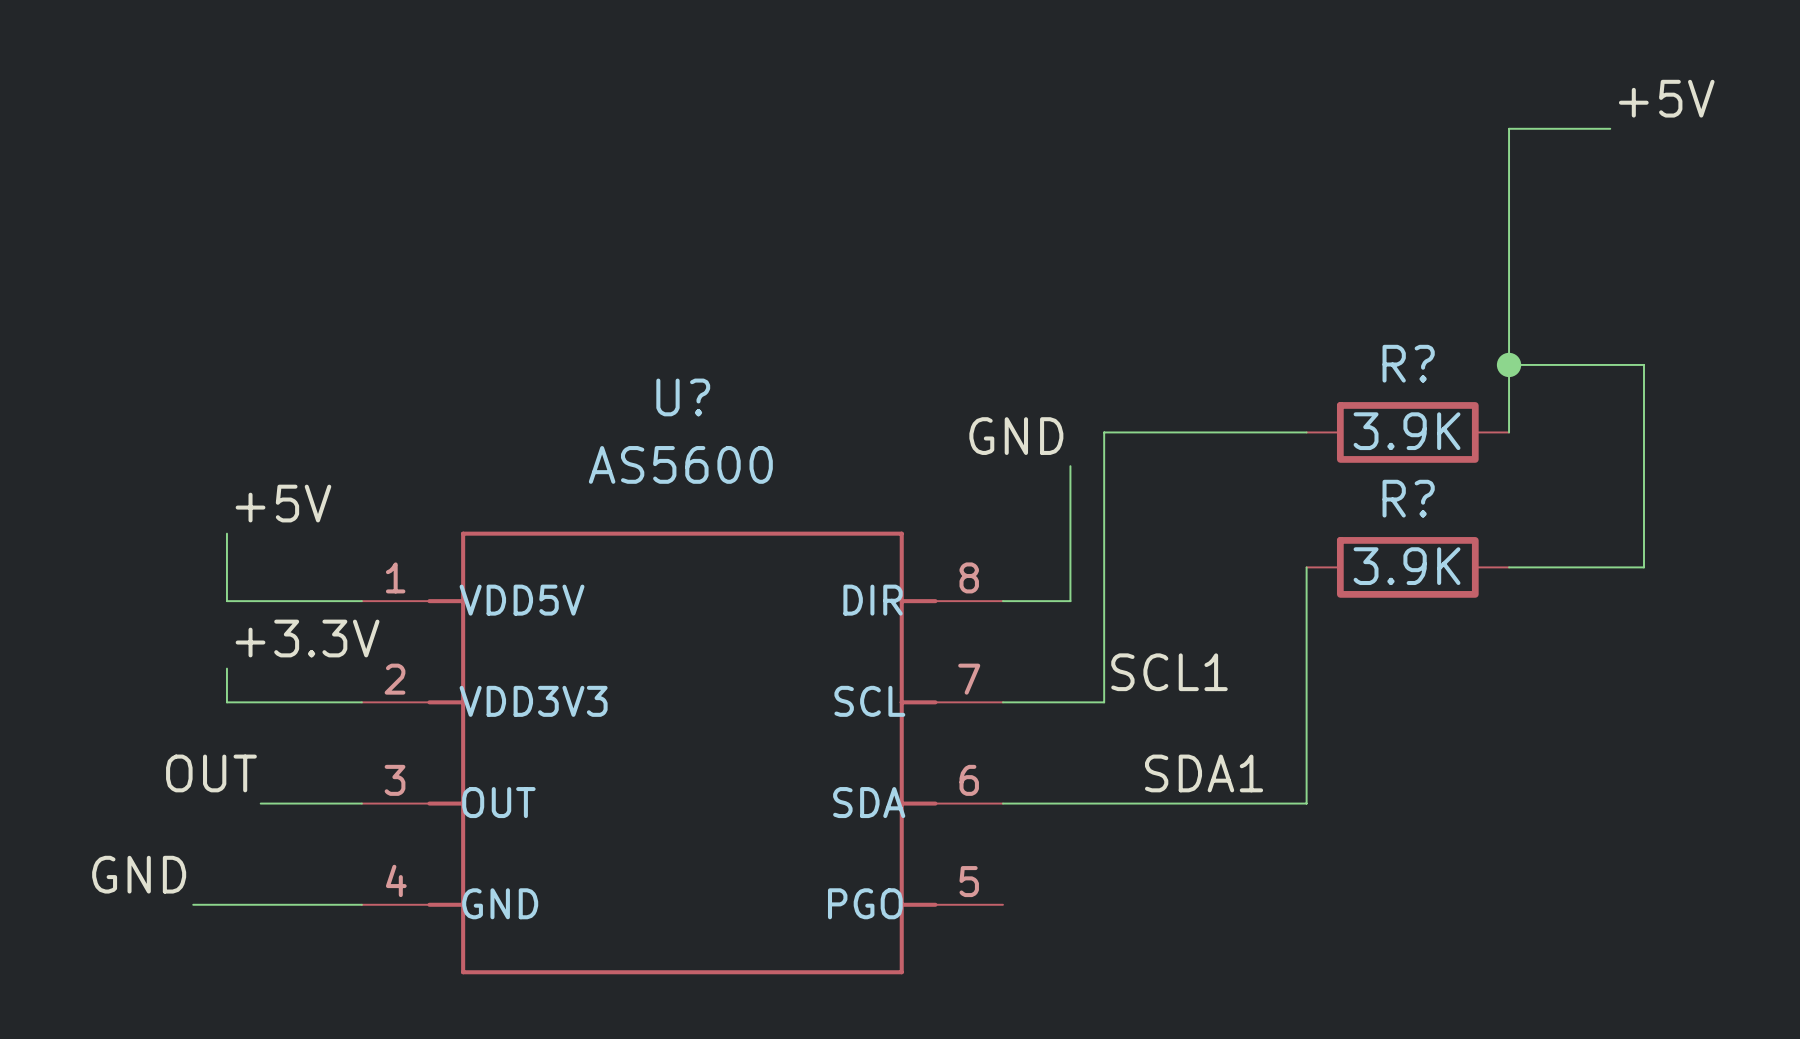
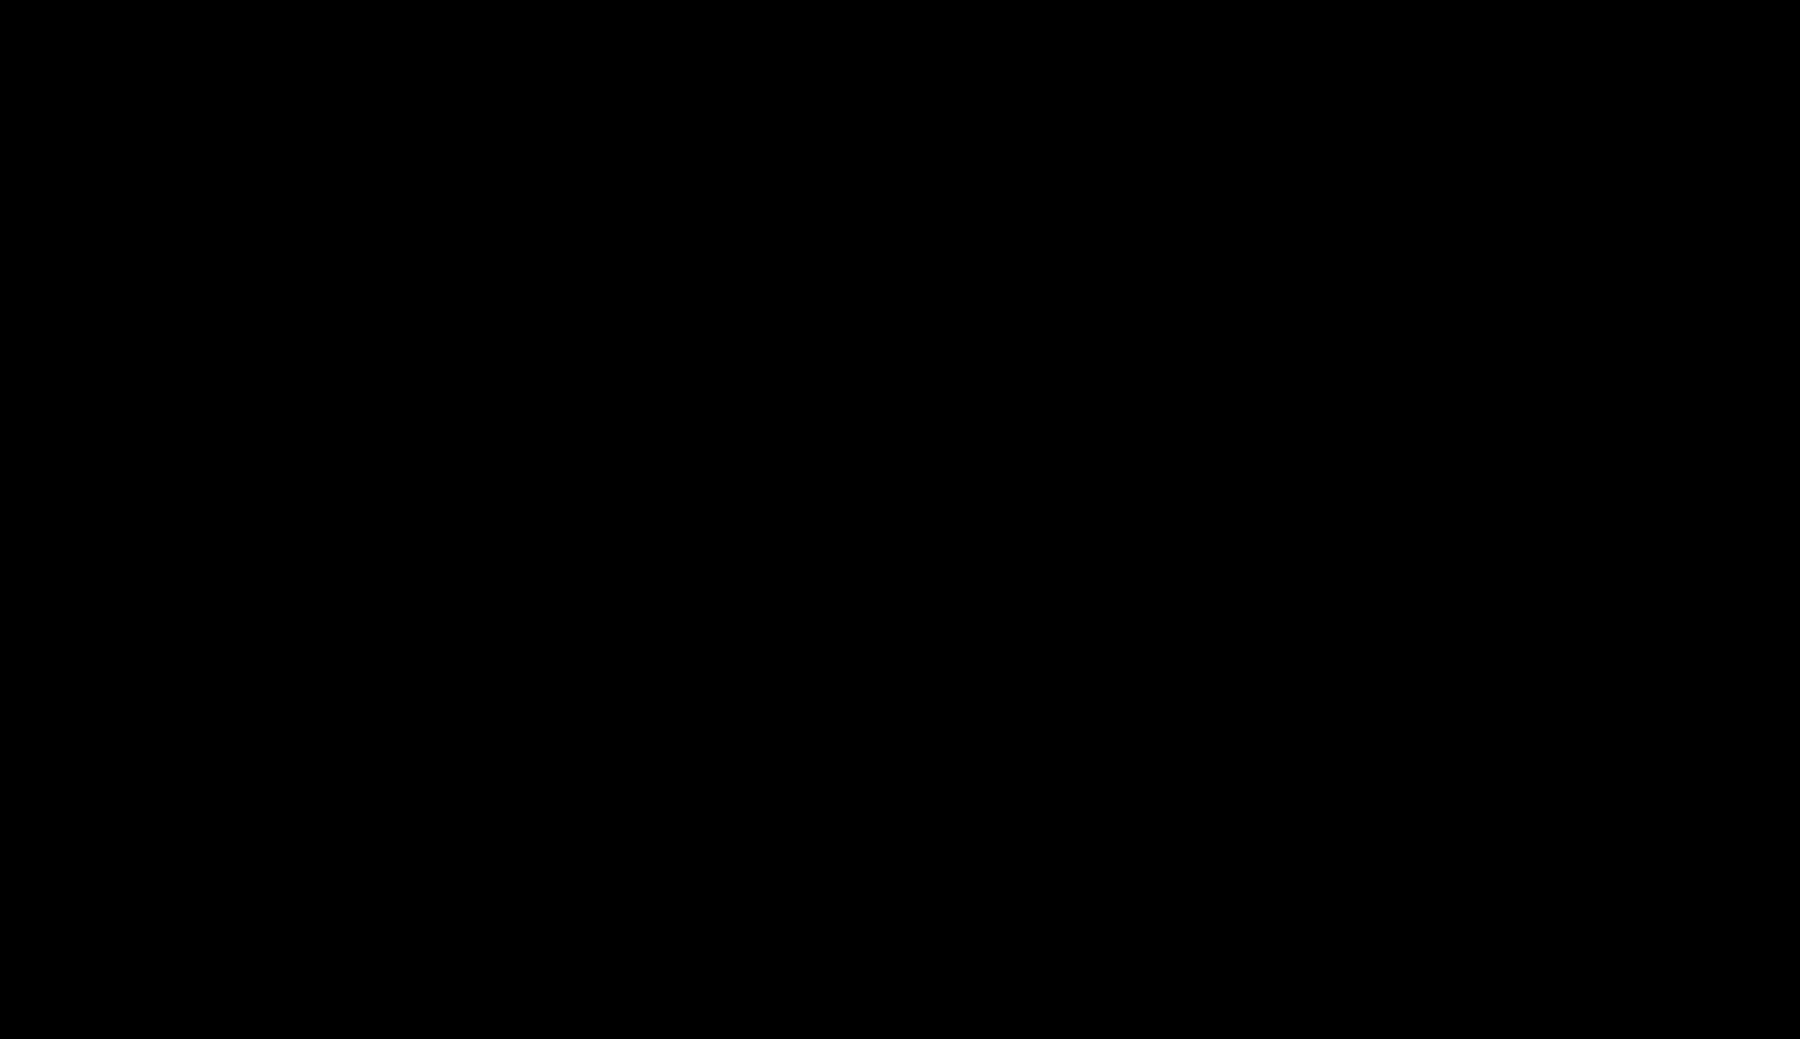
label: +5V (1666, 98) -> none
wire: (1610, 128) (1509, 128) (1509, 432) -> none
wire: (1509, 364) (1643, 364) (1643, 567) (1509, 567) -> none
junction: (1509, 364) -> none
wire: (1306, 432) (1104, 432) (1104, 702) (1002, 702) -> none
R?: 3.9K (1407, 432) -> none
label: GND (1016, 436) -> none
wire: (1070, 466) (1070, 601) (1002, 601) -> none
label: +5V (283, 503) -> none
wire: (226, 533) (226, 601) (361, 601) -> none
wire: (1306, 567) (1306, 803) (1002, 803) -> none
R?: 3.9K (1407, 567) -> none
label: +3.3V (307, 638) -> none
wire: (226, 668) (226, 702) (361, 702) -> none
label: SCL1 (1169, 672) -> none
U?: AS5600 (682, 752) -> none
label: OUT (211, 773) -> none
label: SDA1 (1204, 773) -> none
wire: (260, 803) (361, 803) -> none
label: GND (139, 874) -> none
wire: (193, 904) (361, 904) -> none

